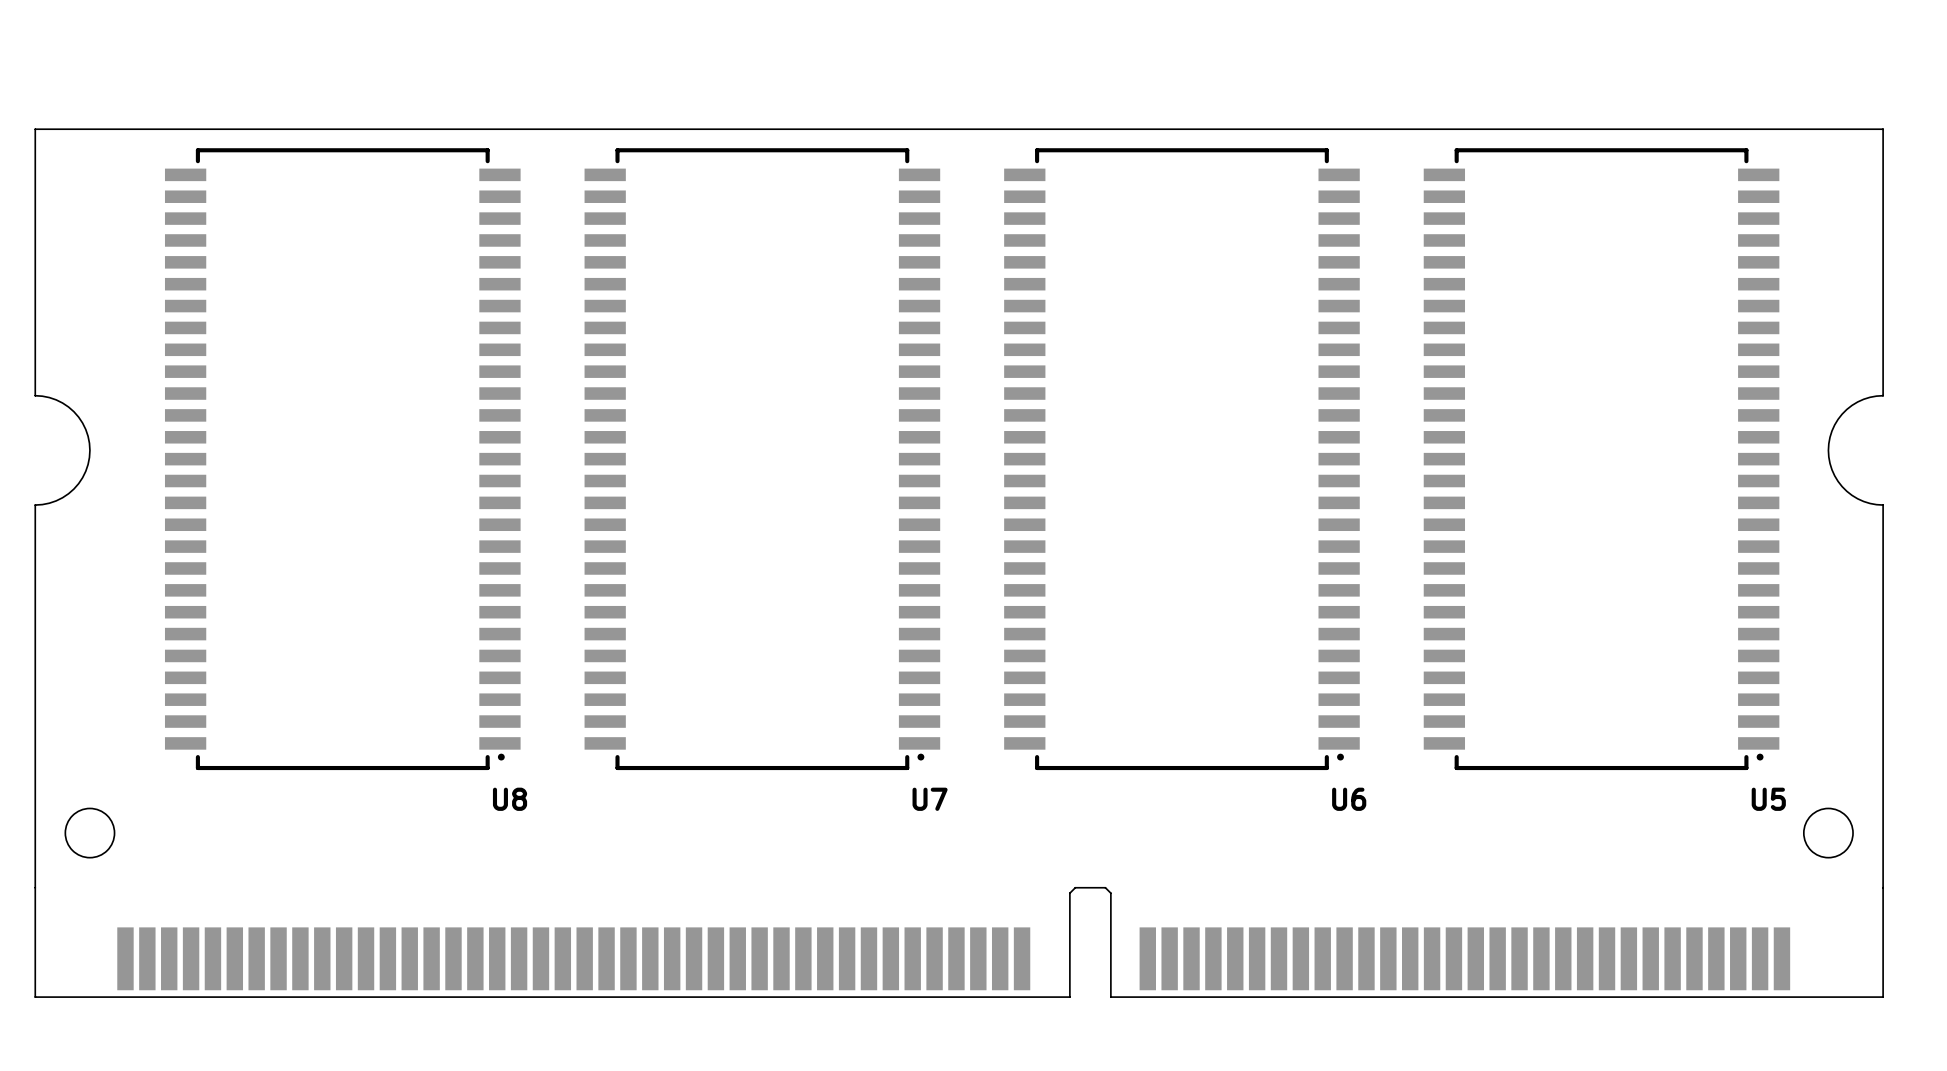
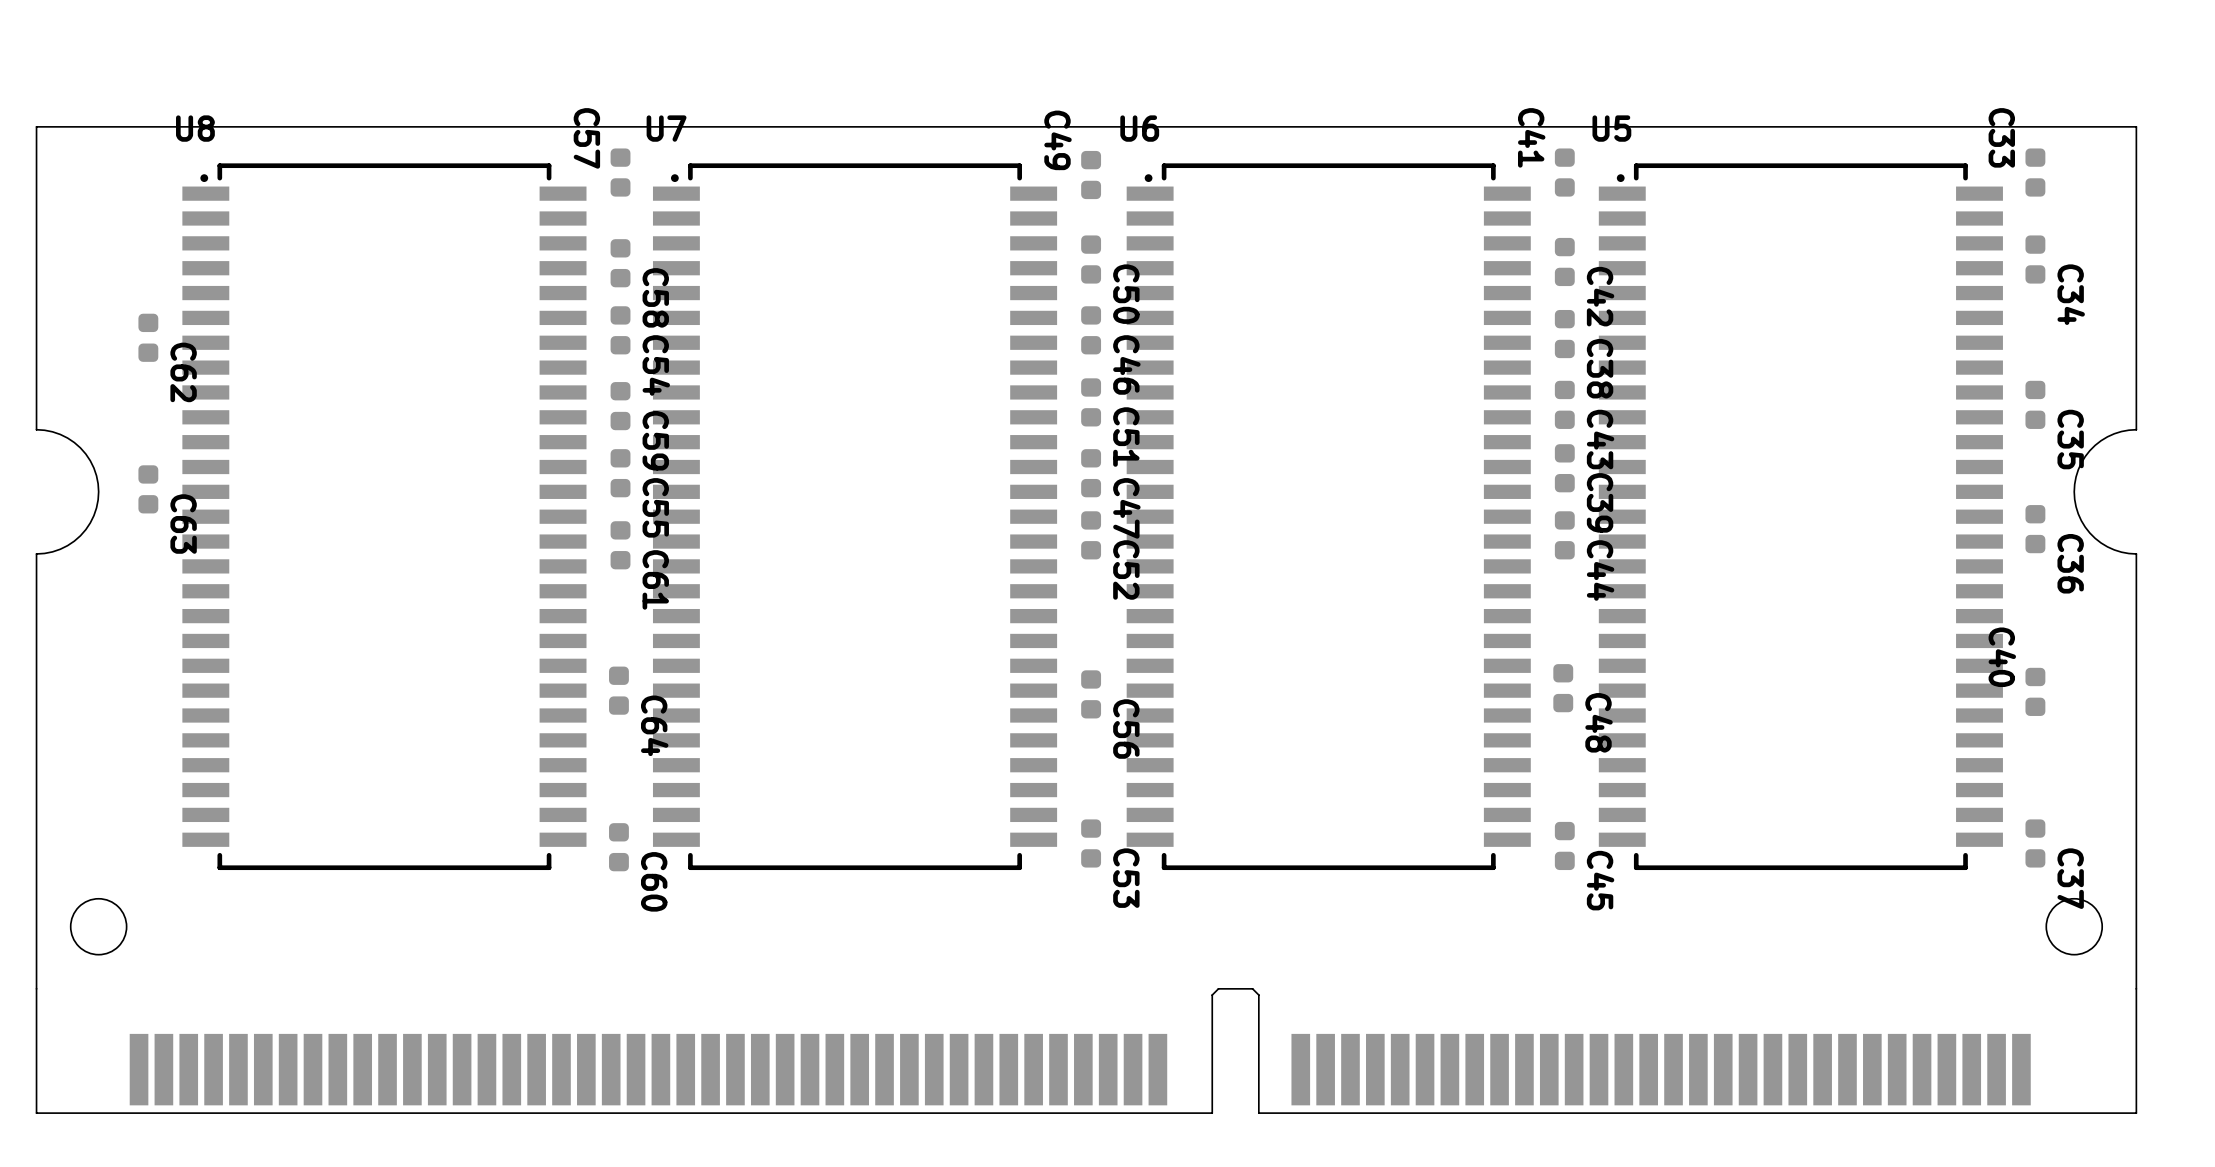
C57: none -> (620, 172)
C41: none -> (1564, 172)
C33: none -> (2035, 172)
C49: none -> (1091, 175)
C50: none -> (1091, 259)
C34: none -> (2035, 259)
C42: none -> (1564, 261)
C58: none -> (620, 263)
C54: none -> (620, 330)
C46: none -> (1091, 330)
C38: none -> (1564, 334)
C62: none -> (148, 337)
C51: none -> (1091, 402)
C43: none -> (1564, 404)
C35: none -> (2035, 404)
C59: none -> (620, 406)
C39: none -> (1564, 468)
C55: none -> (620, 473)
C47: none -> (1091, 473)
C63: none -> (148, 489)
U8 rotation: 0° (342, 459) -> 180° (384, 516)
U7 rotation: 0° (762, 459) -> 180° (855, 516)
U6 rotation: 0° (1181, 459) -> 180° (1328, 516)
U5 rotation: 0° (1601, 459) -> 180° (1800, 516)
C36: none -> (2035, 529)
C52: none -> (1091, 535)
C44: none -> (1564, 535)
C61: none -> (620, 545)
C48: none -> (1563, 688)
C64: none -> (618, 690)
C40: none -> (2035, 691)
C56: none -> (1091, 694)
C53: none -> (1091, 843)
C37: none -> (2035, 843)
C45: none -> (1564, 845)
C60: none -> (618, 847)

